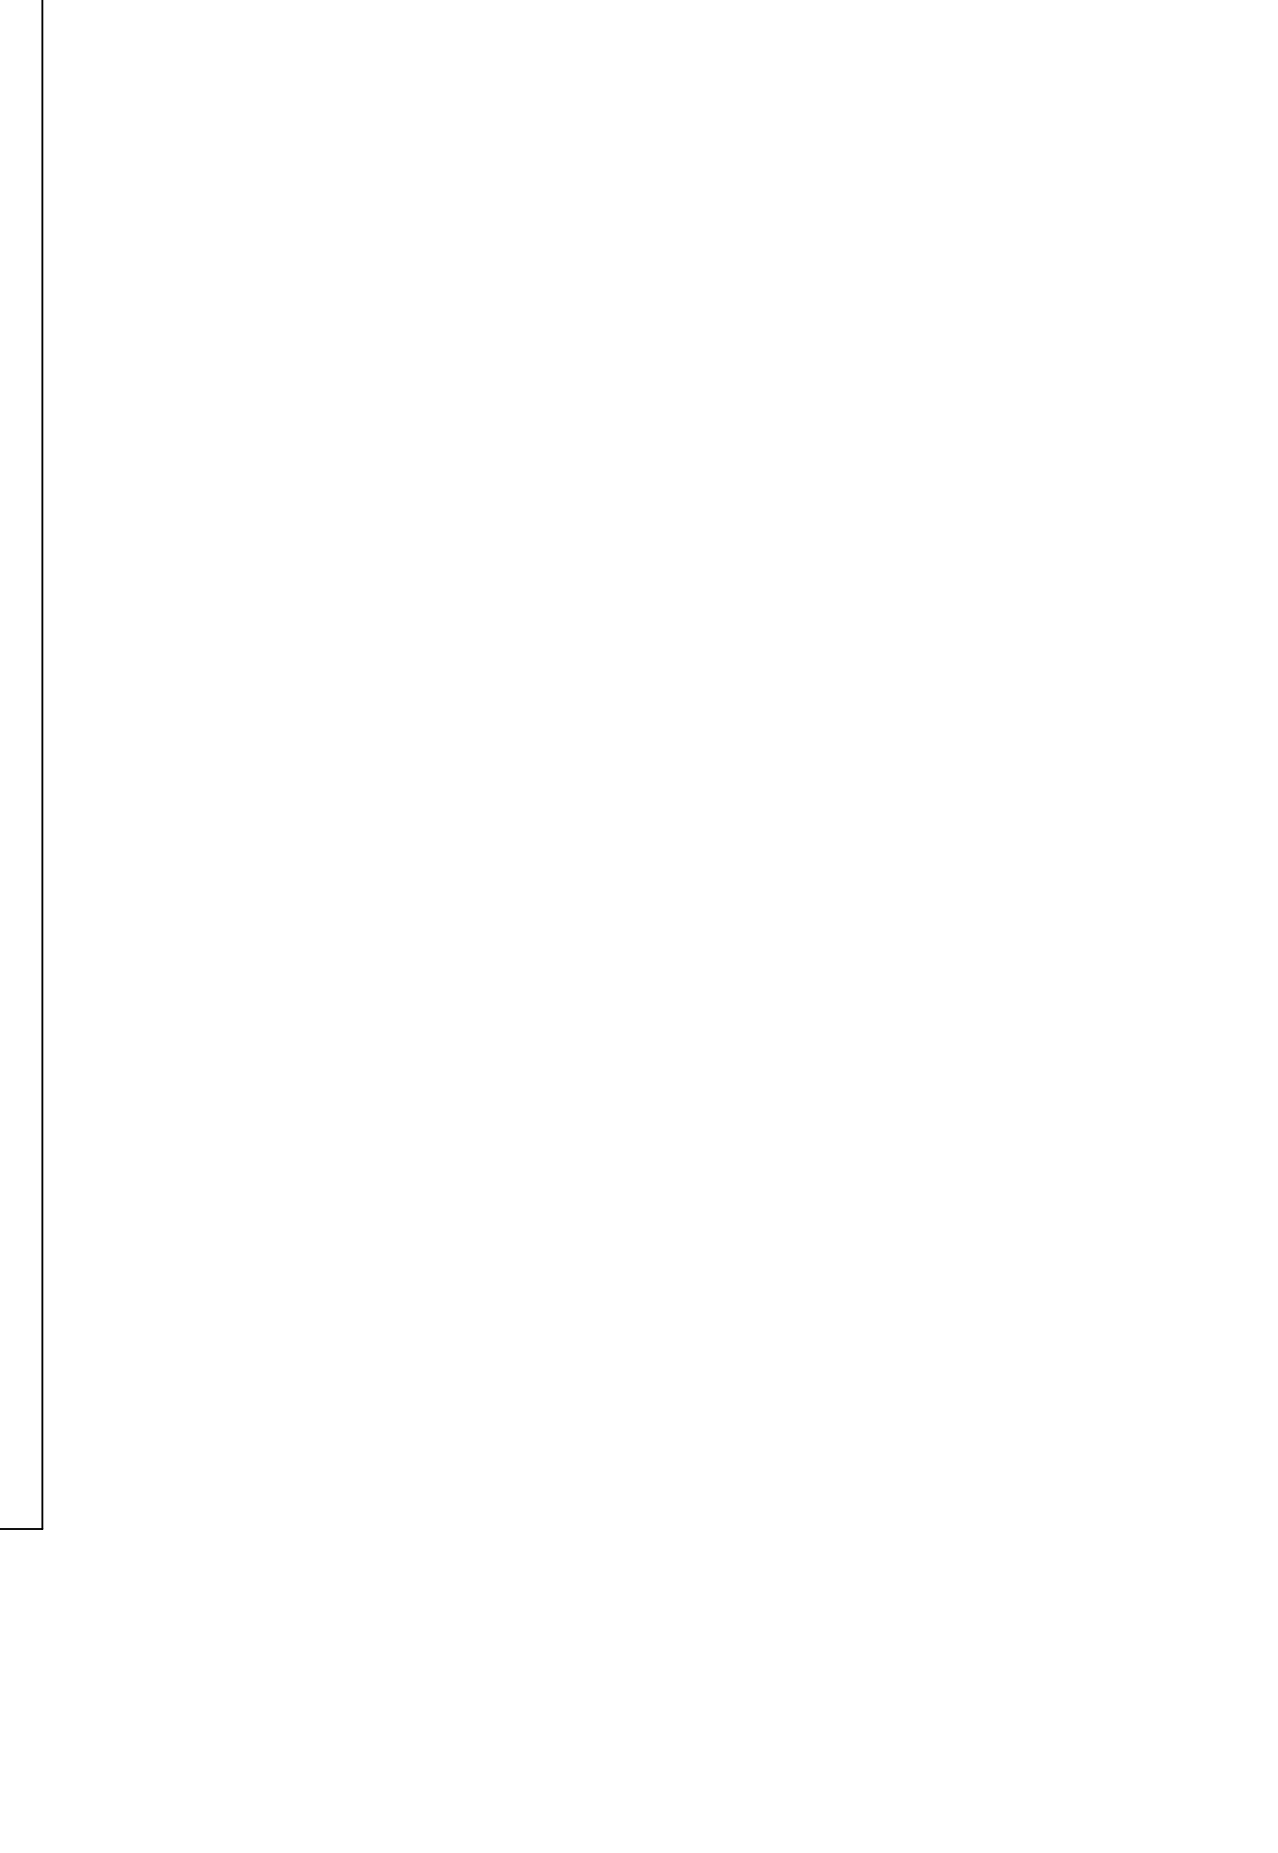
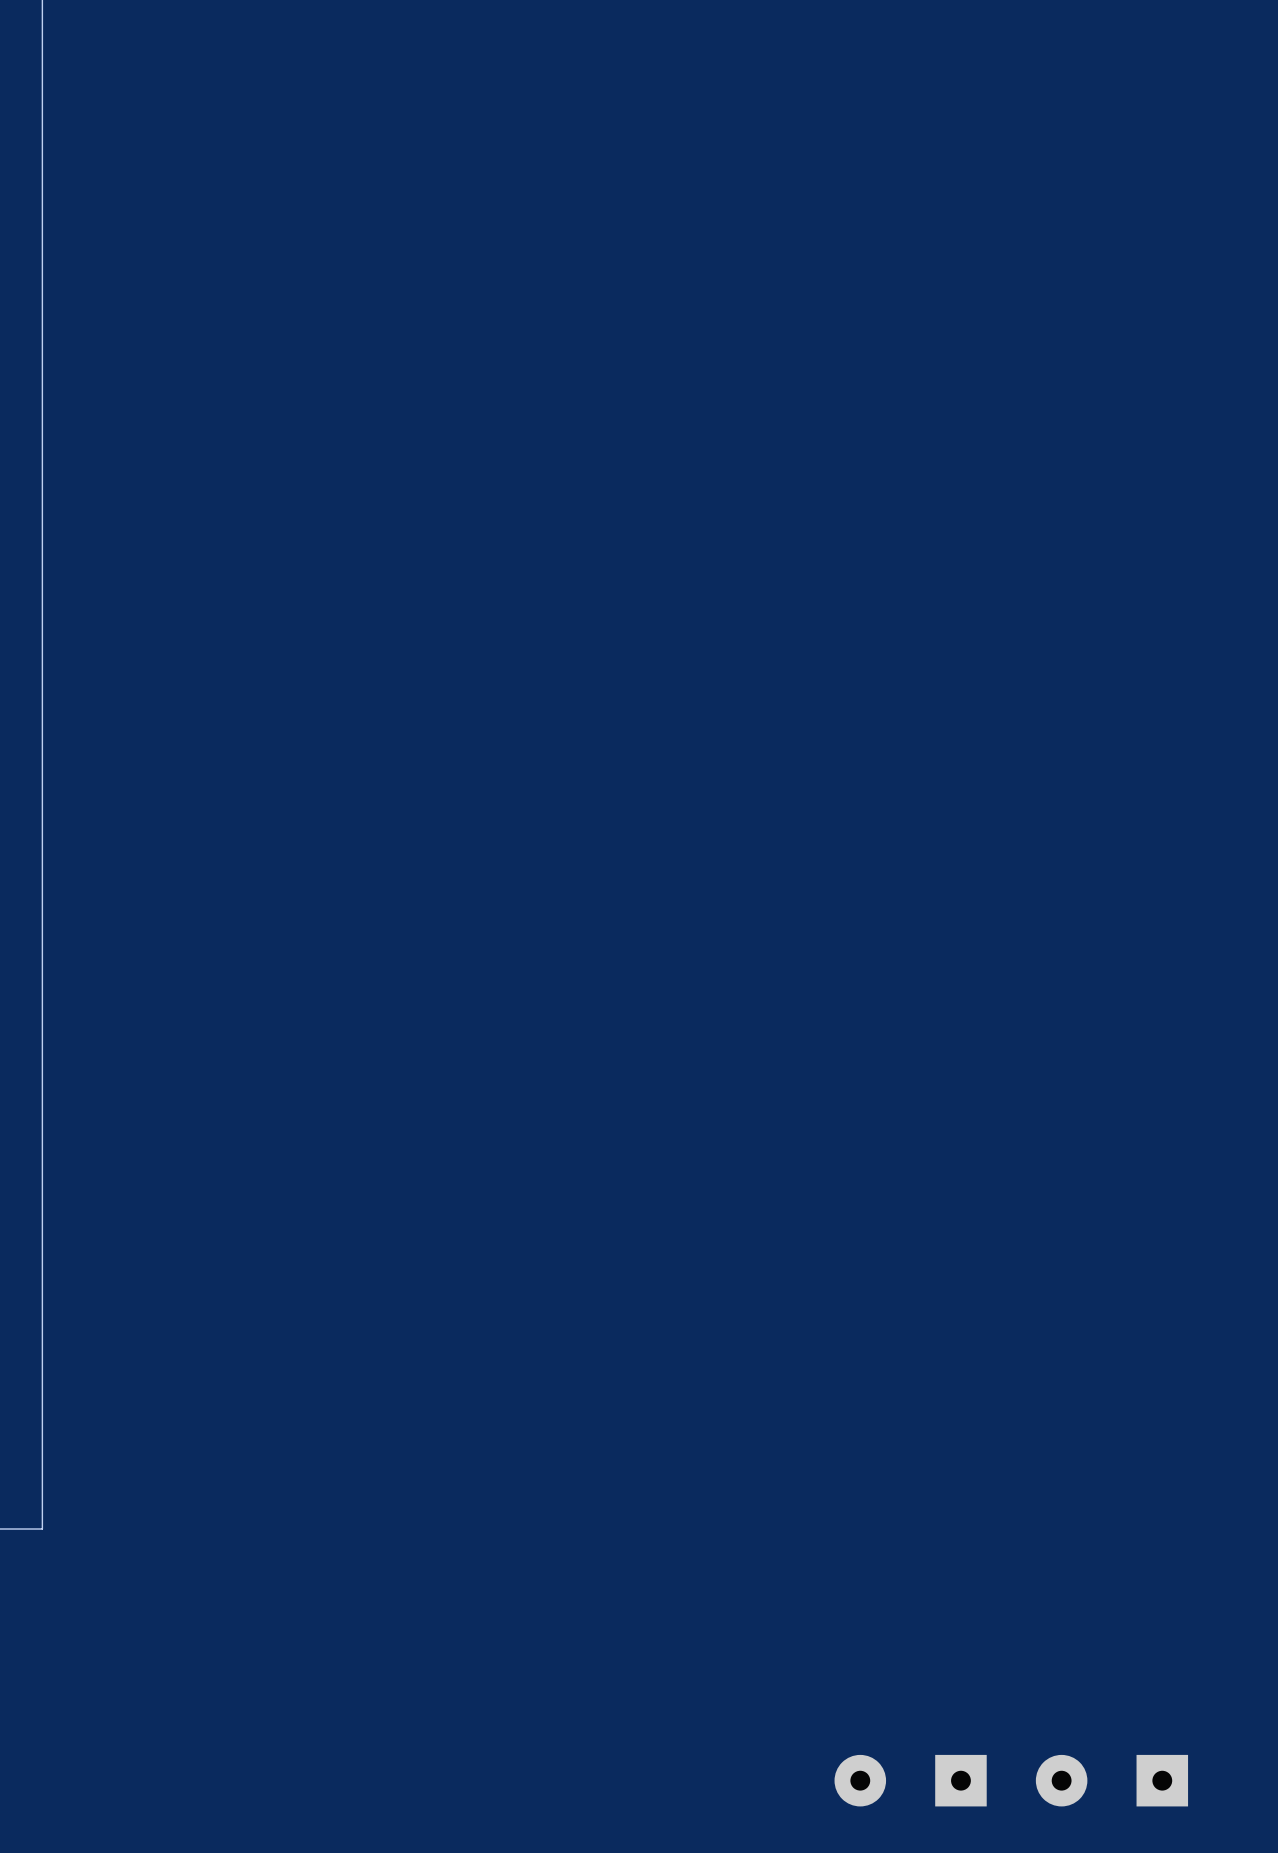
part: none -> (910, 1780)
part: none -> (1111, 1780)

